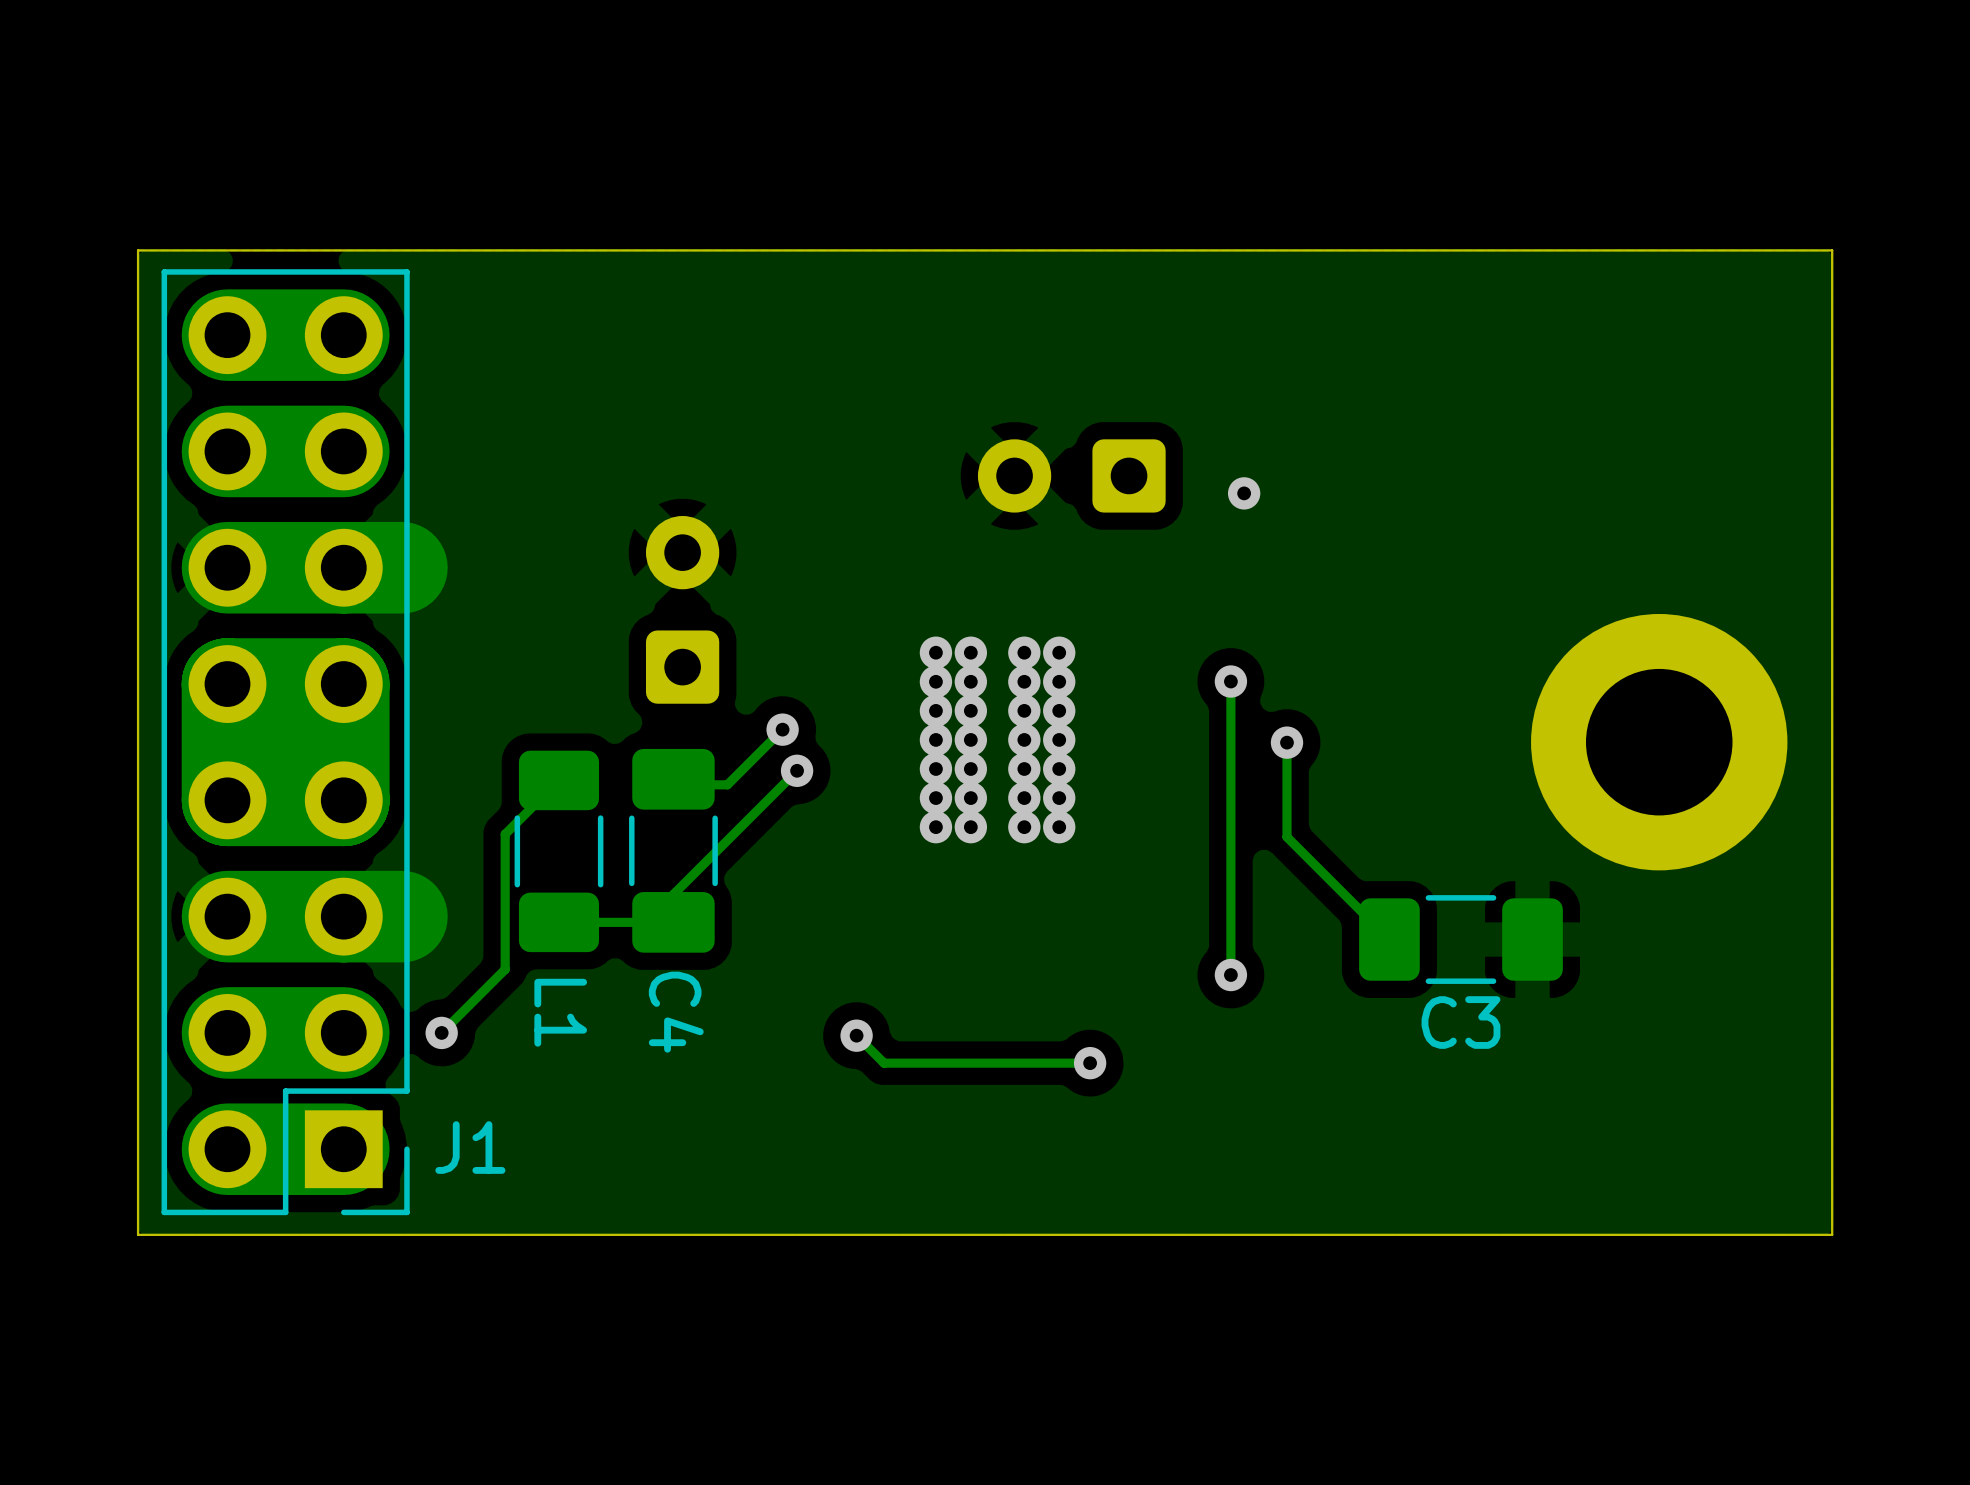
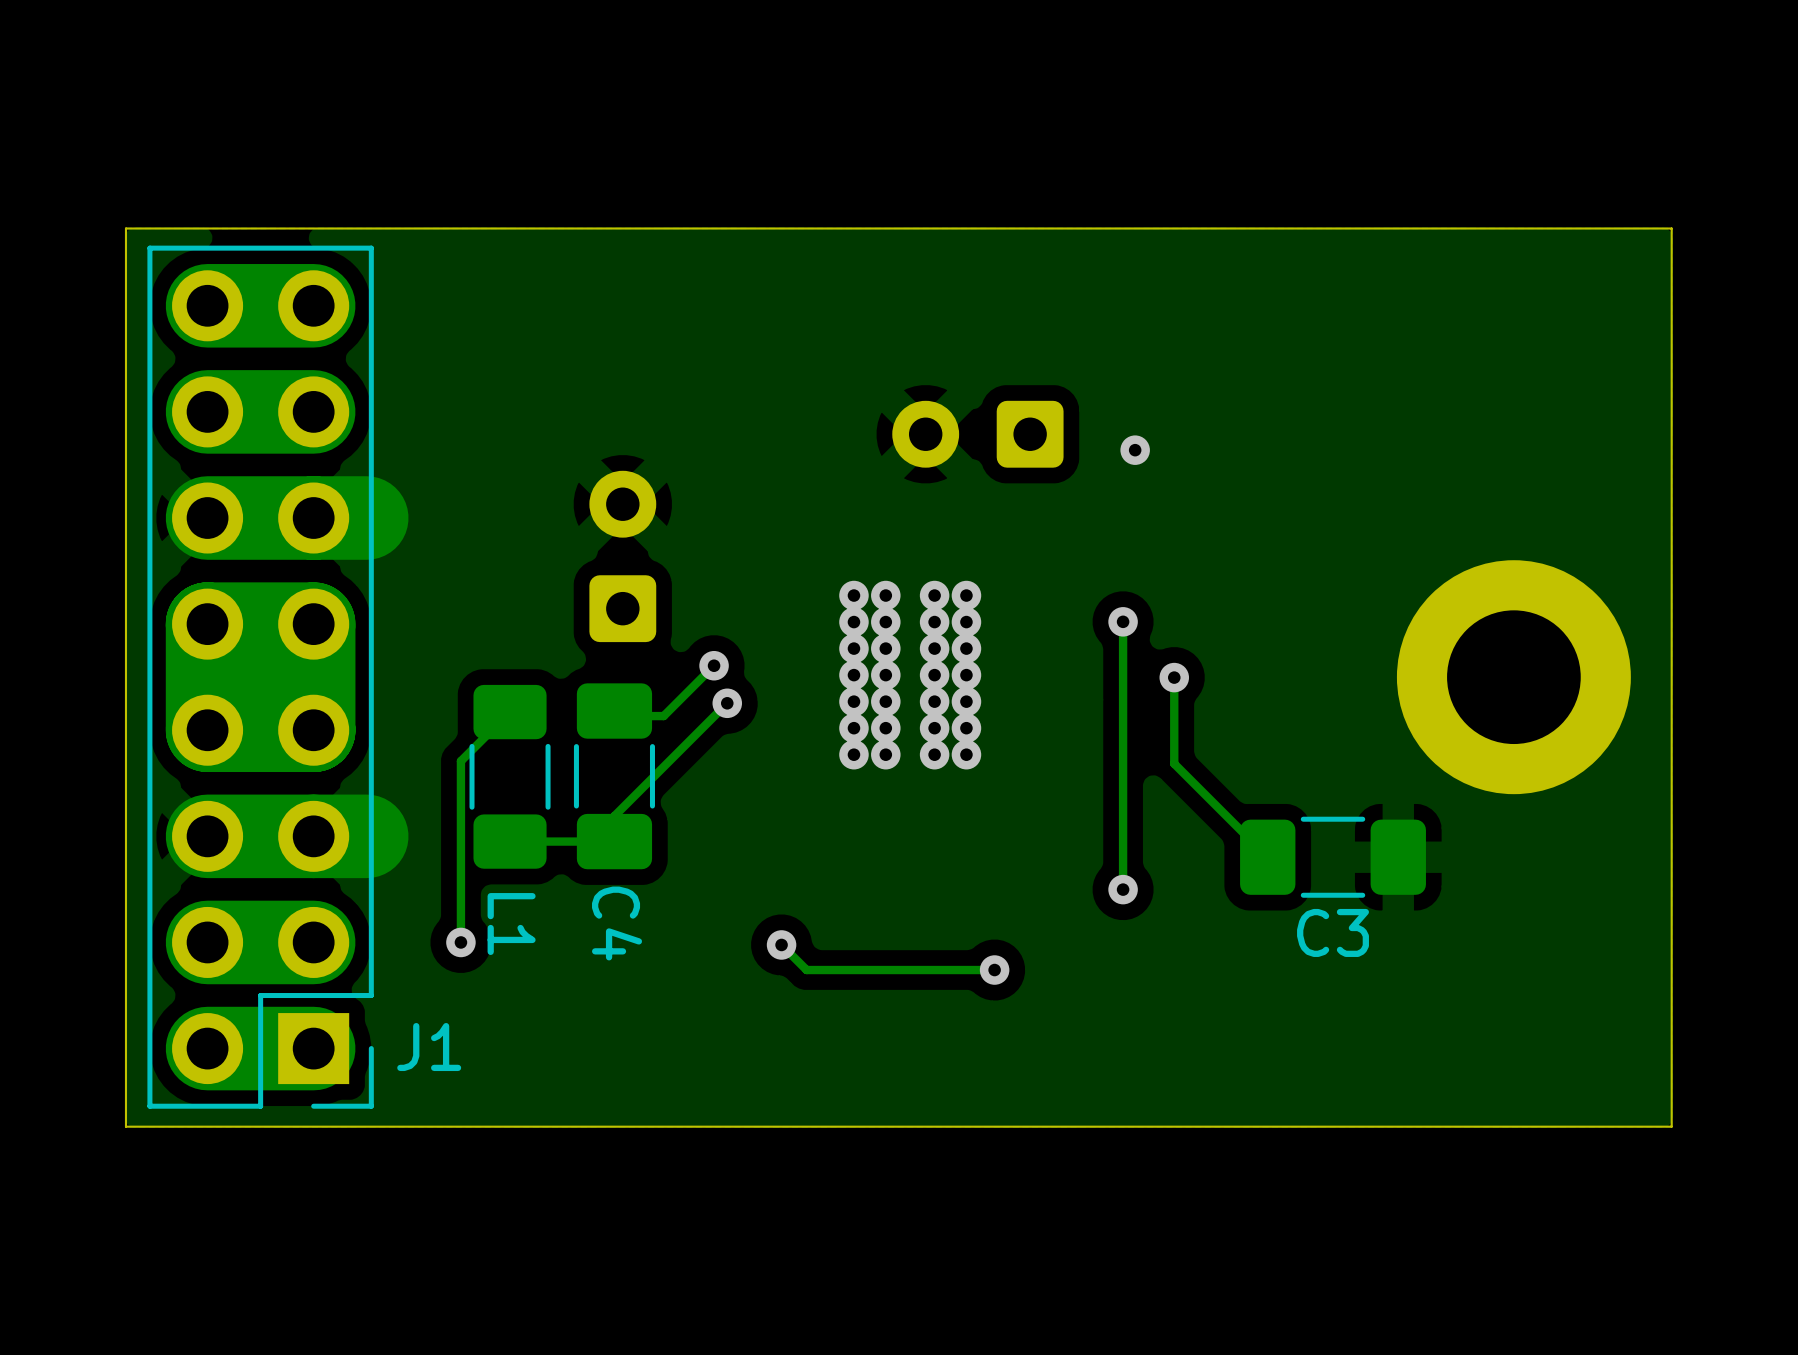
track: (505, 969) (441, 1032) -> (460, 884) (460, 942)
via position: (441, 1032) -> (460, 942)

